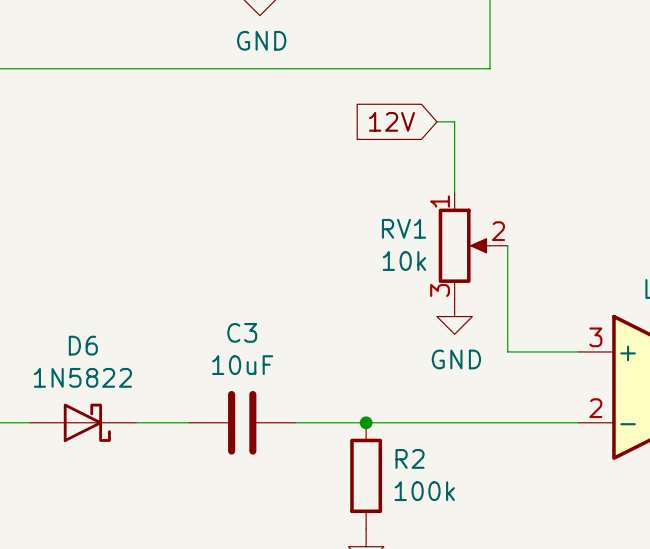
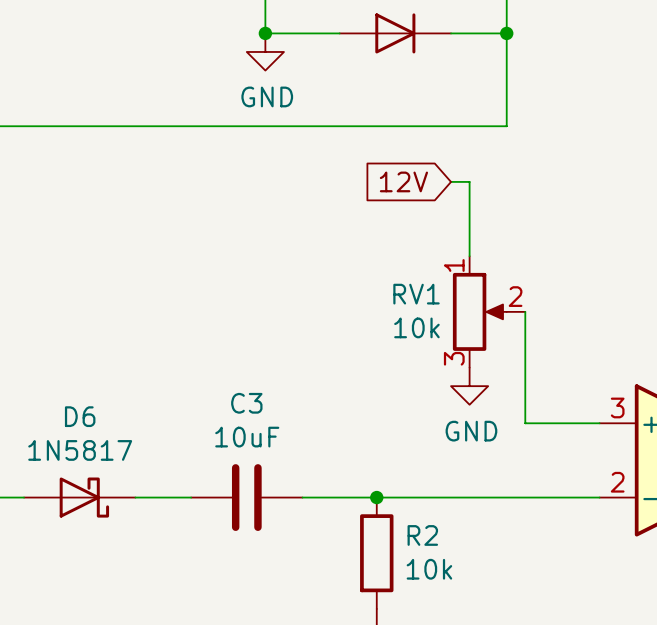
D6 value: 1N5822 (82, 377) -> 1N5817 (80, 450)
R2 value: 100k (424, 491) -> 10k (429, 569)

